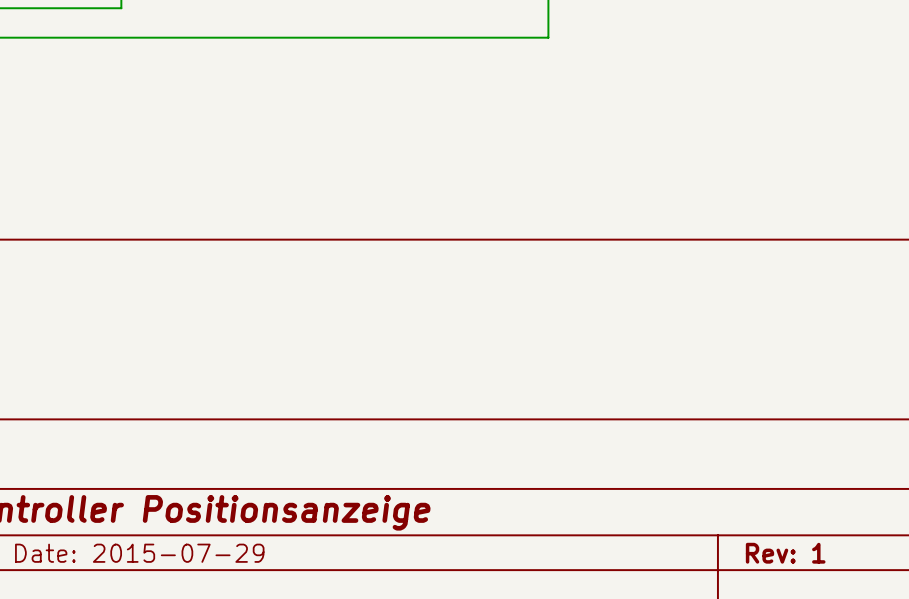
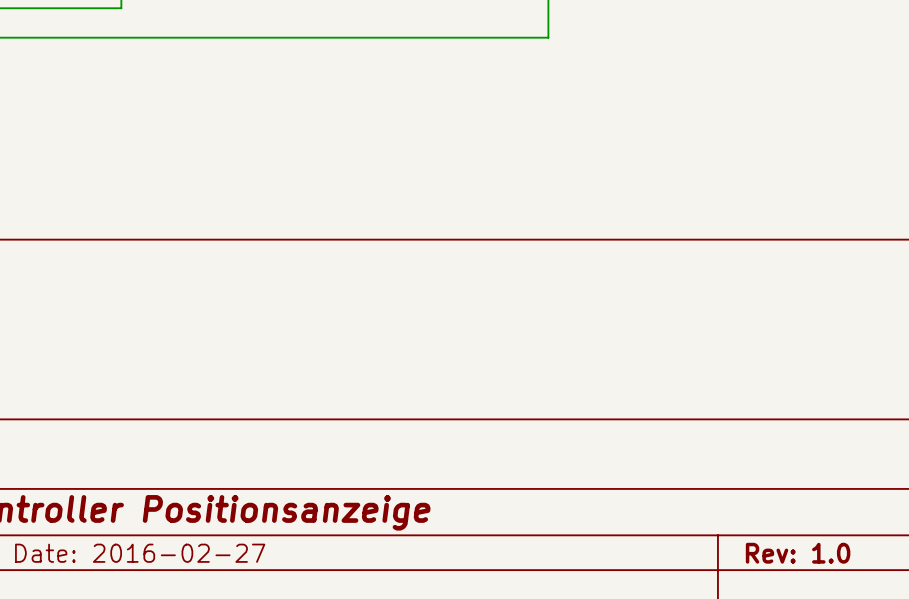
title block: Date: 2015-07-29 (139, 553) -> Date: 2016-02-27 (140, 553)
title block: Rev: 1 (785, 553) -> Rev: 1.0 (798, 553)

